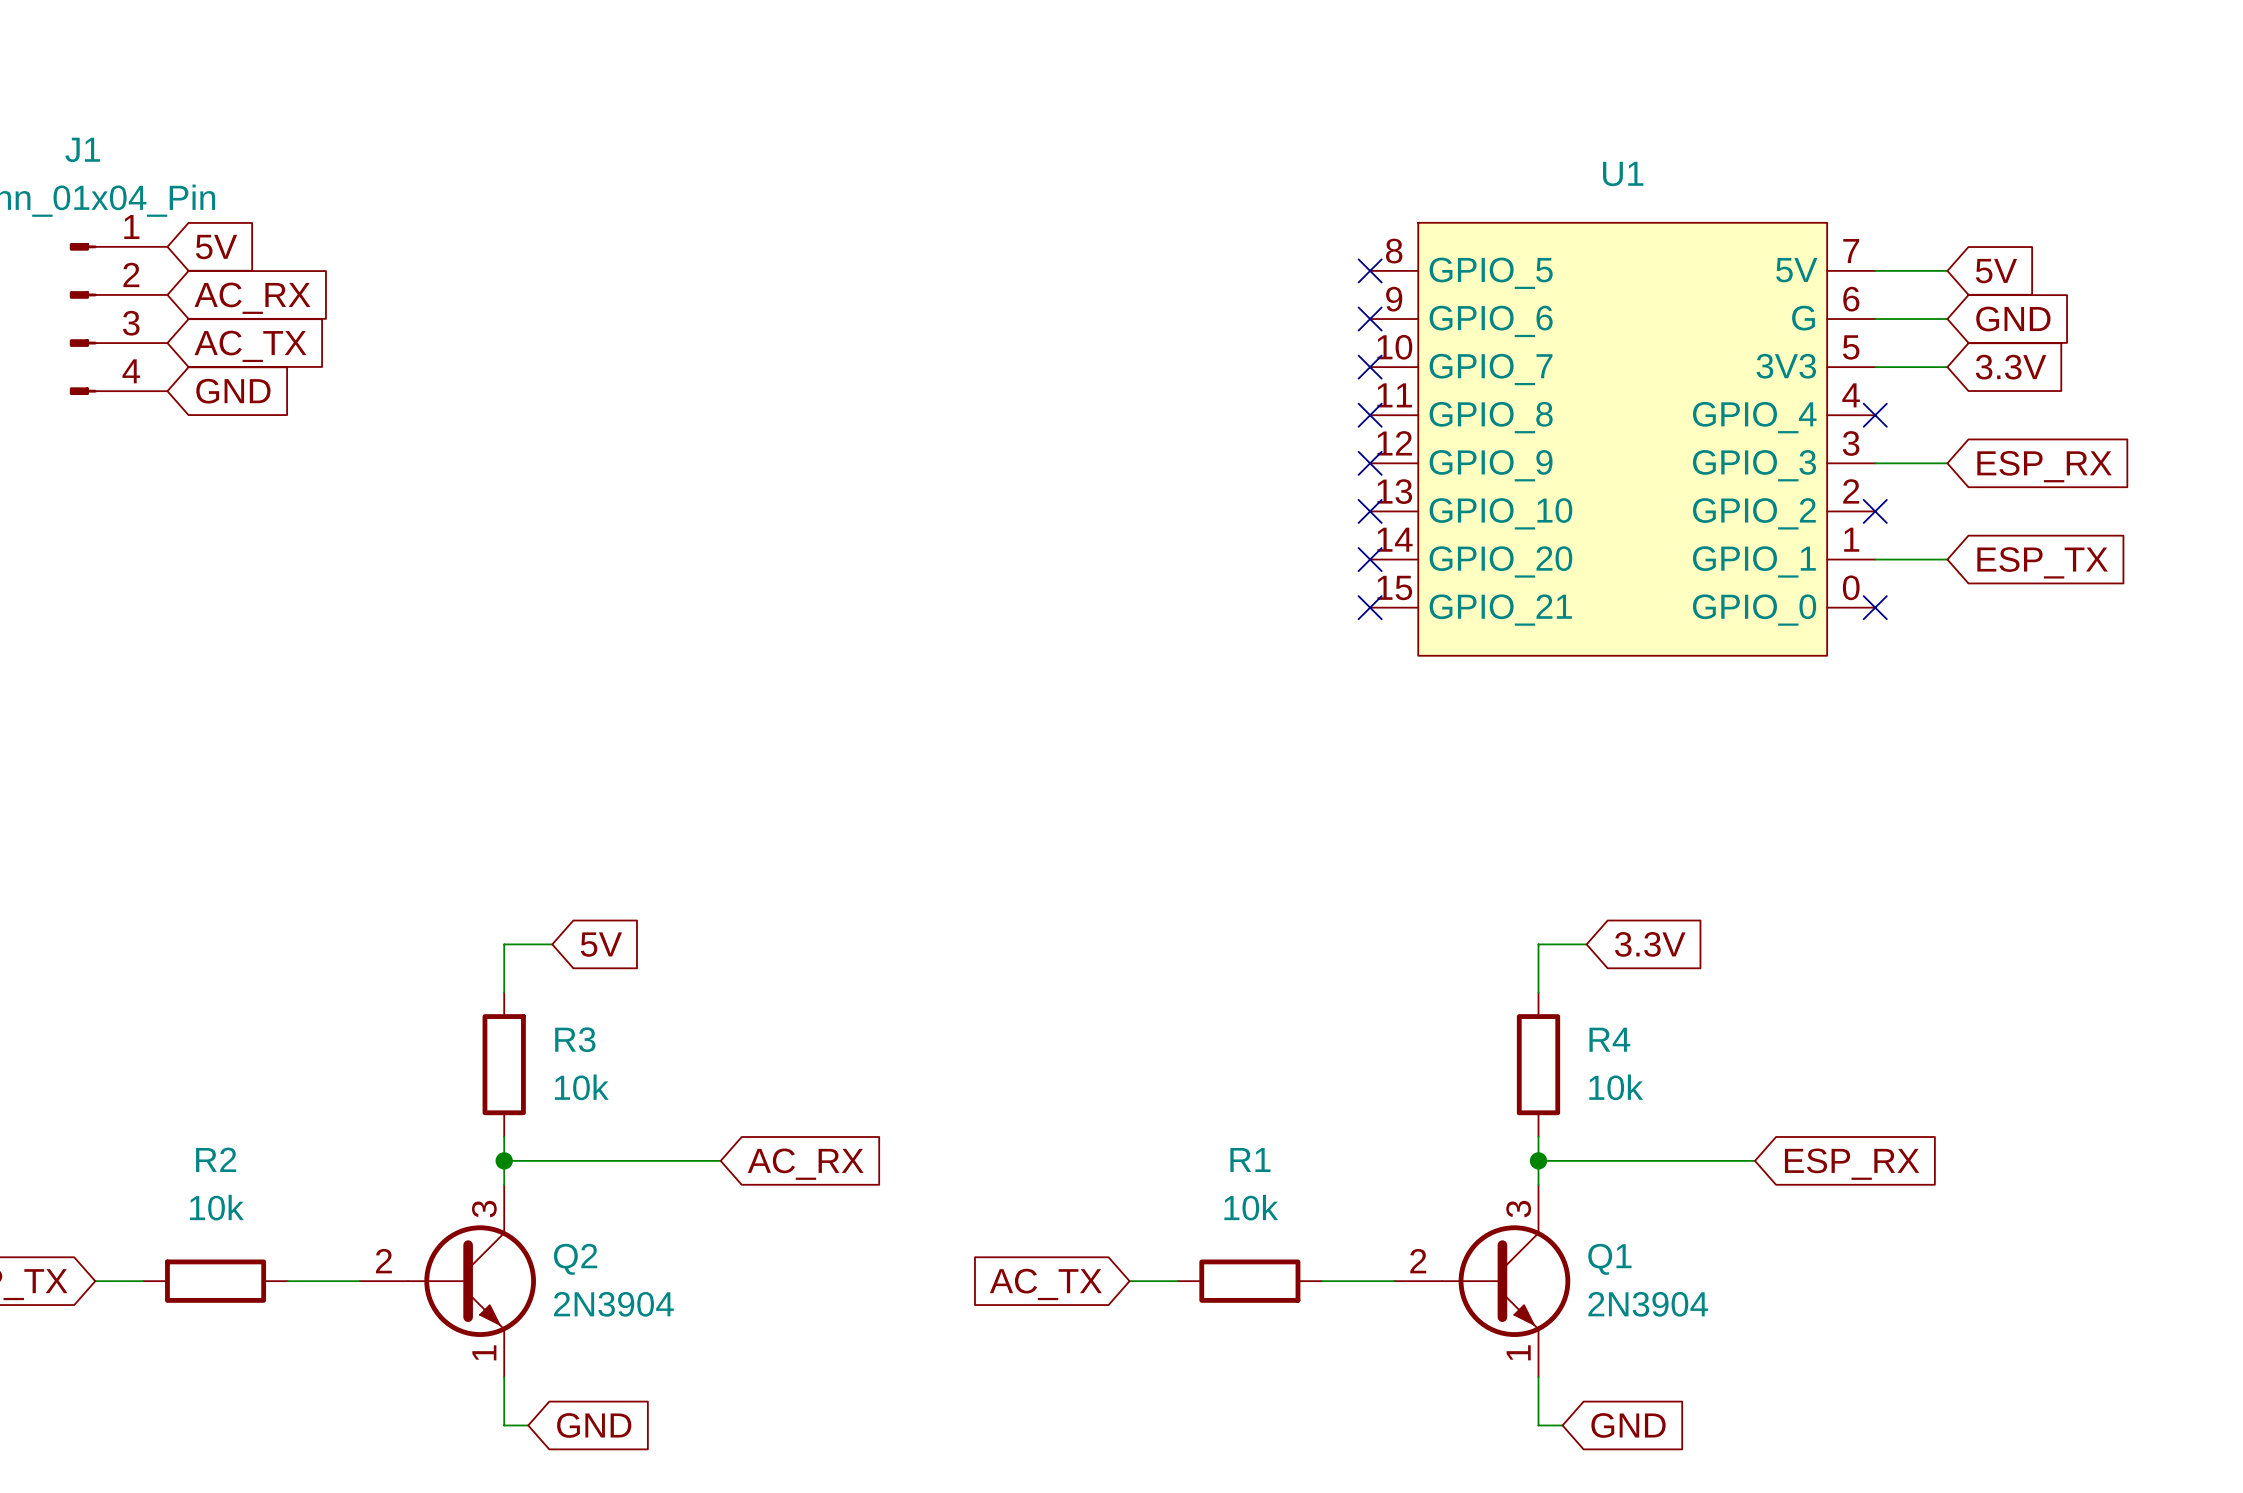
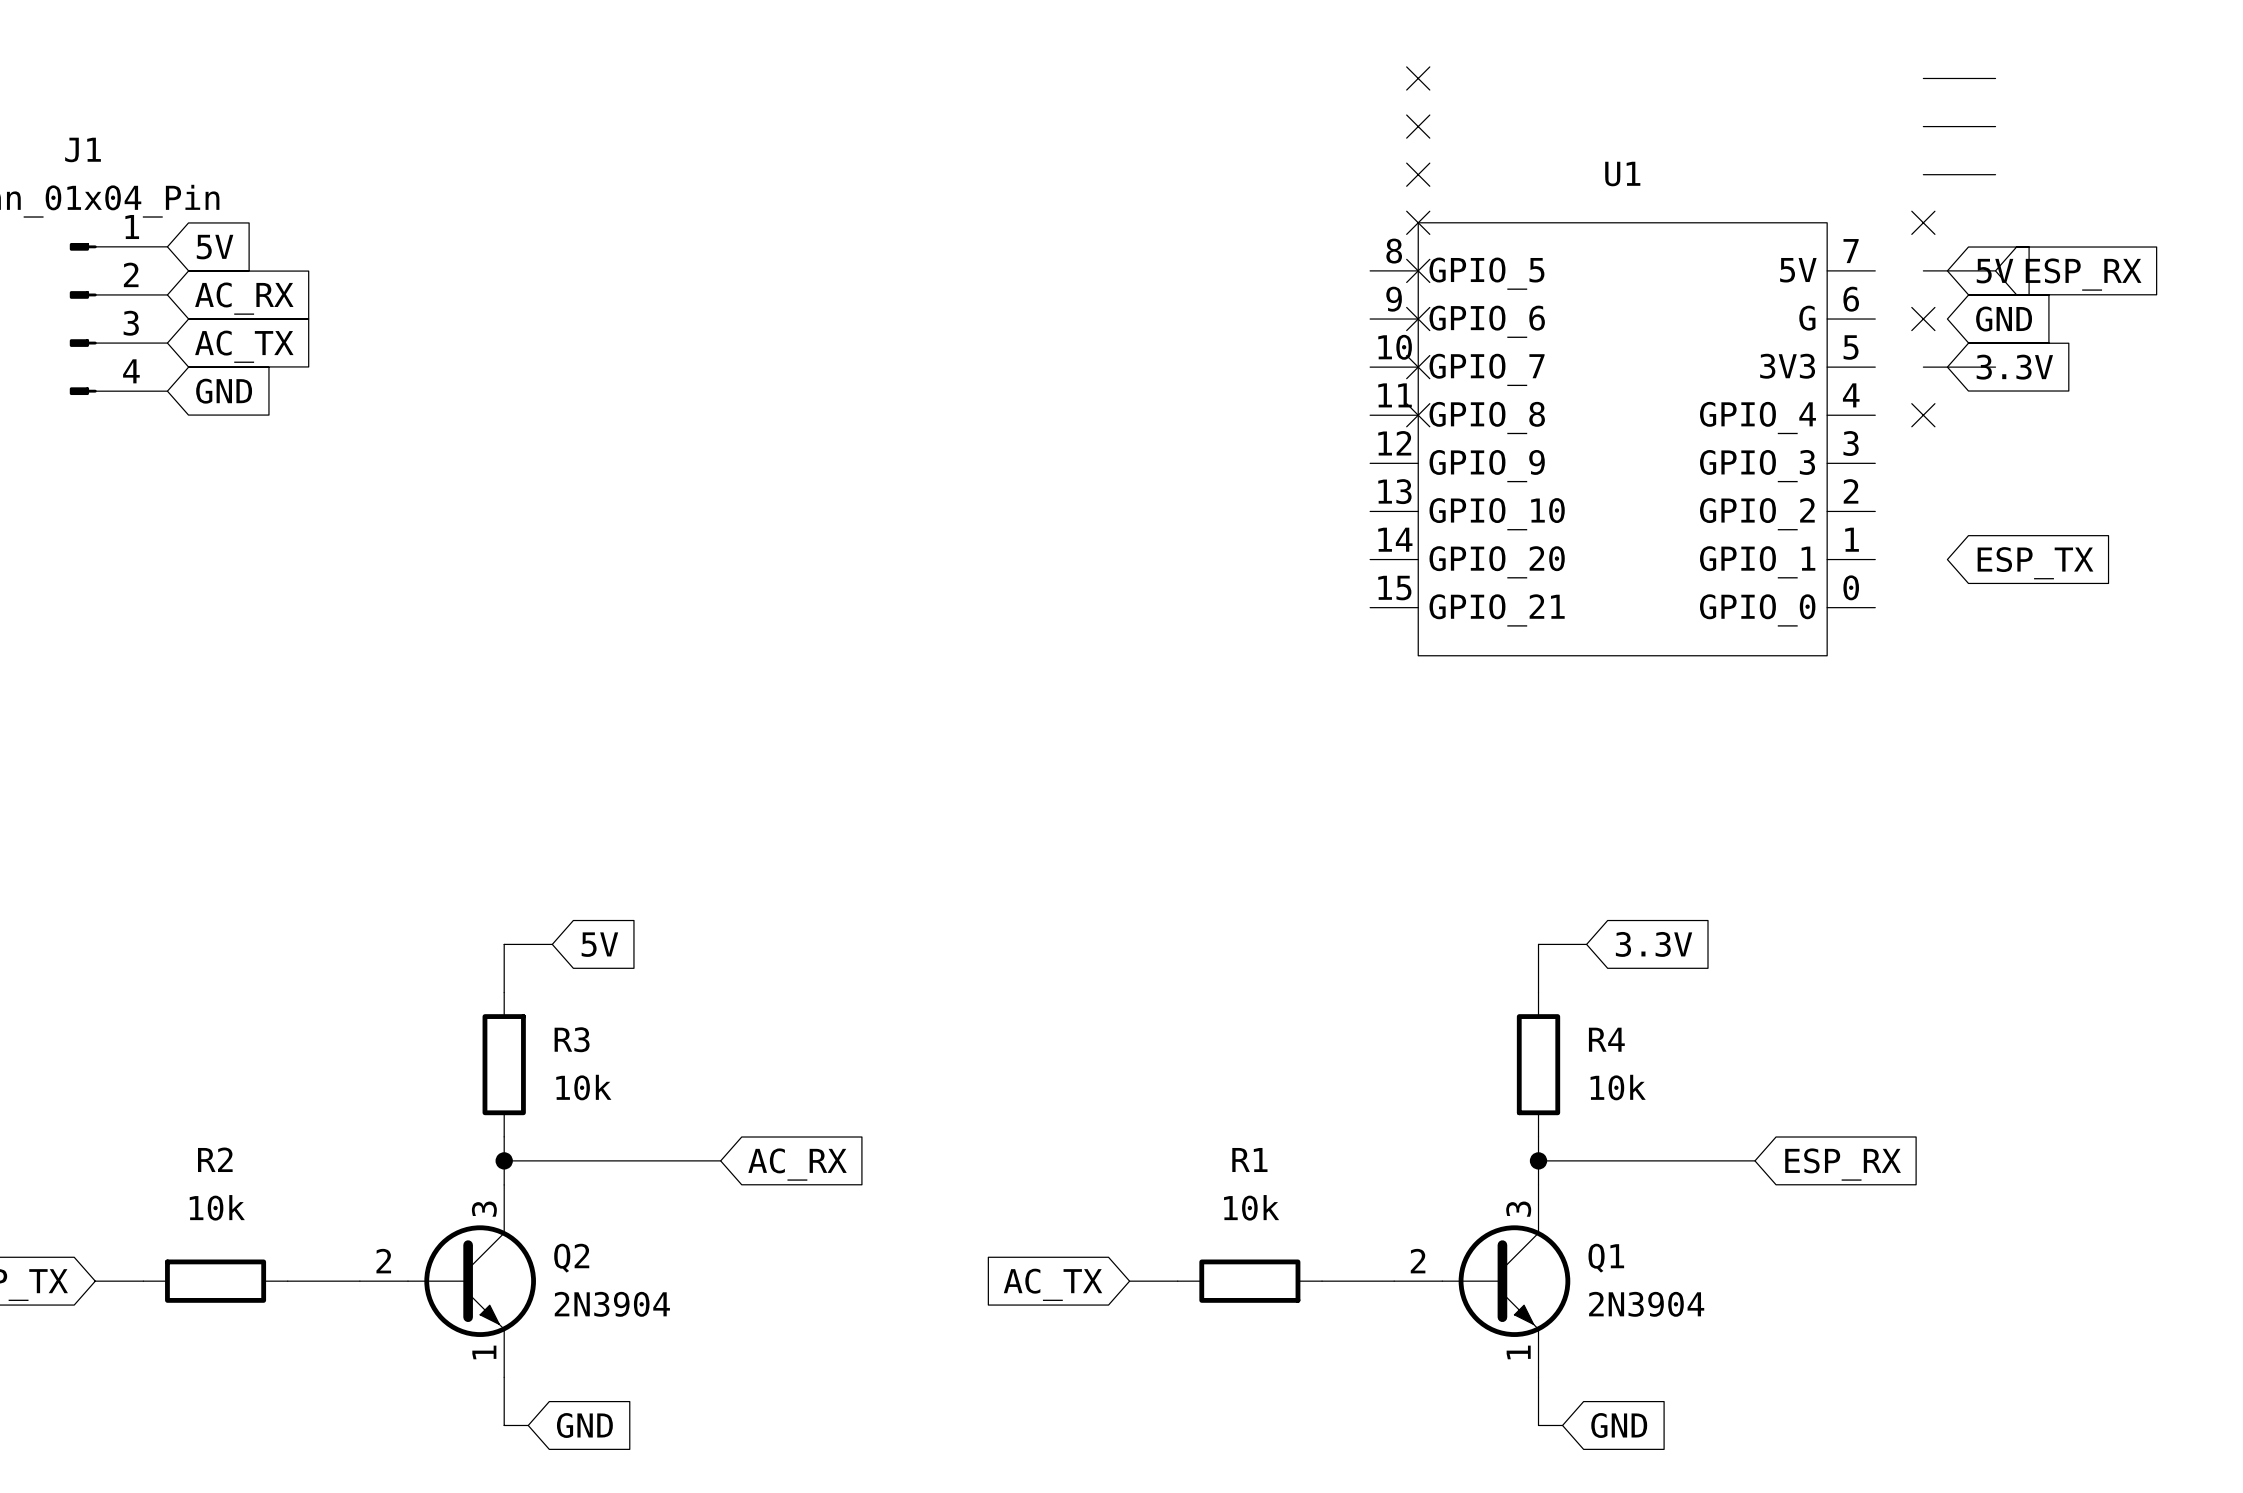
no-connect mark: none -> (1418, 78)
no-connect mark: none -> (1418, 126)
no-connect mark: none -> (1418, 174)
no-connect mark: none -> (1418, 222)
no-connect mark: none -> (1923, 222)
no-connect mark: (1370, 270) -> none
no-connect mark: none -> (1418, 270)
wire: (1875, 270) (1923, 270) -> (1947, 270) (1995, 270)
no-connect mark: (1370, 319) -> none
no-connect mark: none -> (1418, 319)
wire: (1875, 319) (1947, 319) -> (1923, 126) (1995, 126)
no-connect mark: none -> (1923, 319)
no-connect mark: (1370, 367) -> none
no-connect mark: none -> (1418, 367)
wire: (1875, 367) (1923, 367) -> (1947, 367) (1995, 367)
no-connect mark: (1370, 415) -> none
no-connect mark: none -> (1418, 415)
no-connect mark position: (1875, 415) -> (1923, 415)
no-connect mark: (1370, 463) -> none
wire: (1875, 463) (1947, 463) -> (1923, 78) (1995, 78)
global label position: ESP_RX (2044, 466) -> ESP_RX (2083, 274)
no-connect mark: (1370, 511) -> none
no-connect mark: (1875, 511) -> none
no-connect mark: (1370, 559) -> none
wire: (1875, 559) (1947, 559) -> (1923, 174) (1995, 174)
no-connect mark: (1370, 607) -> none
no-connect mark: (1875, 607) -> none

